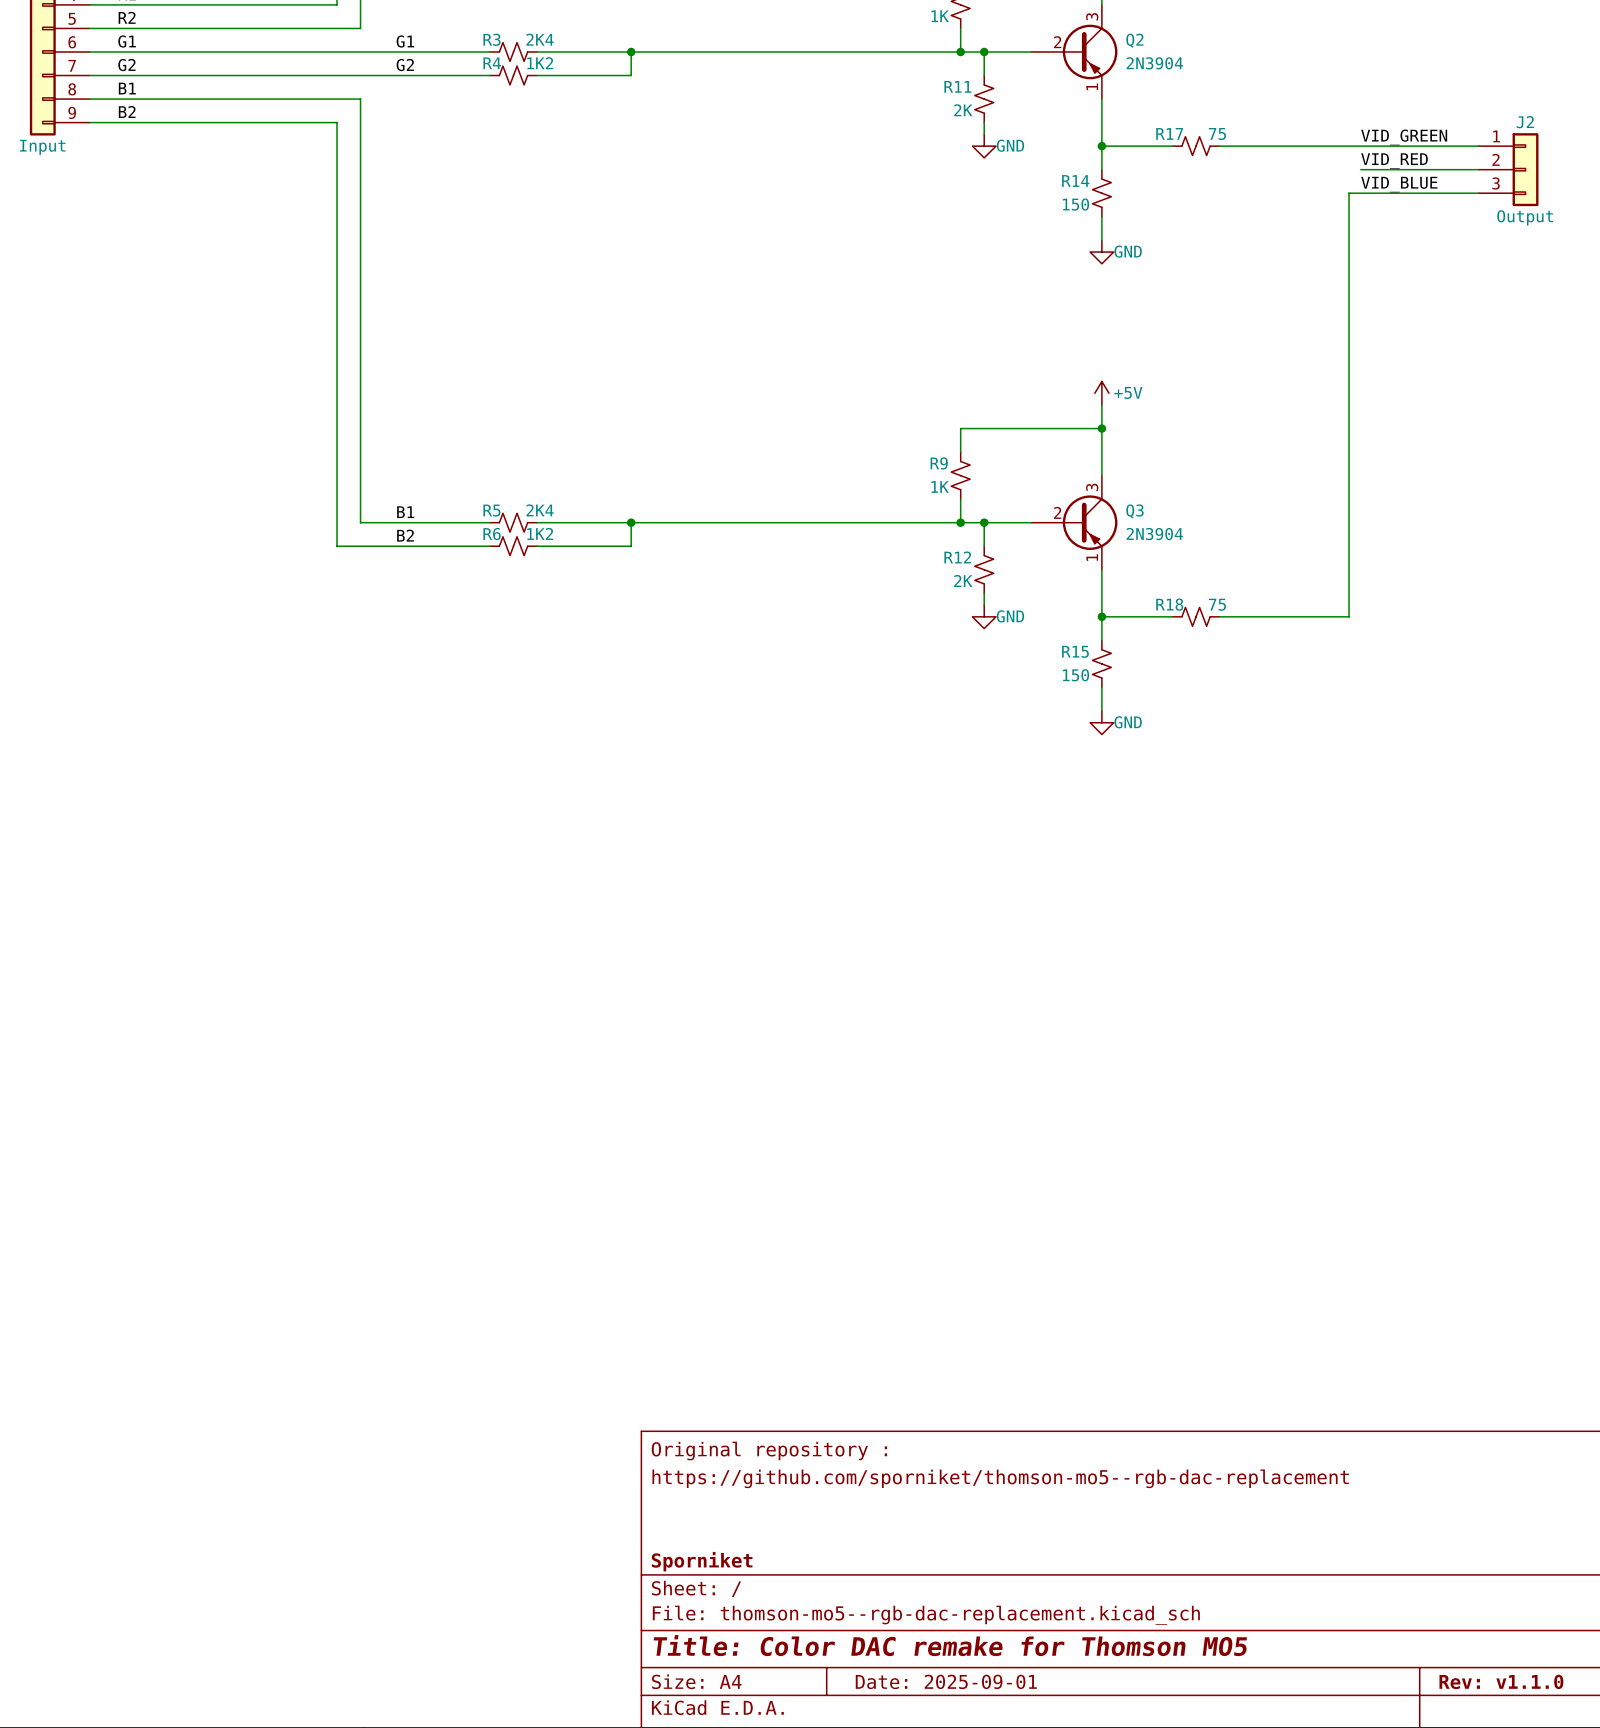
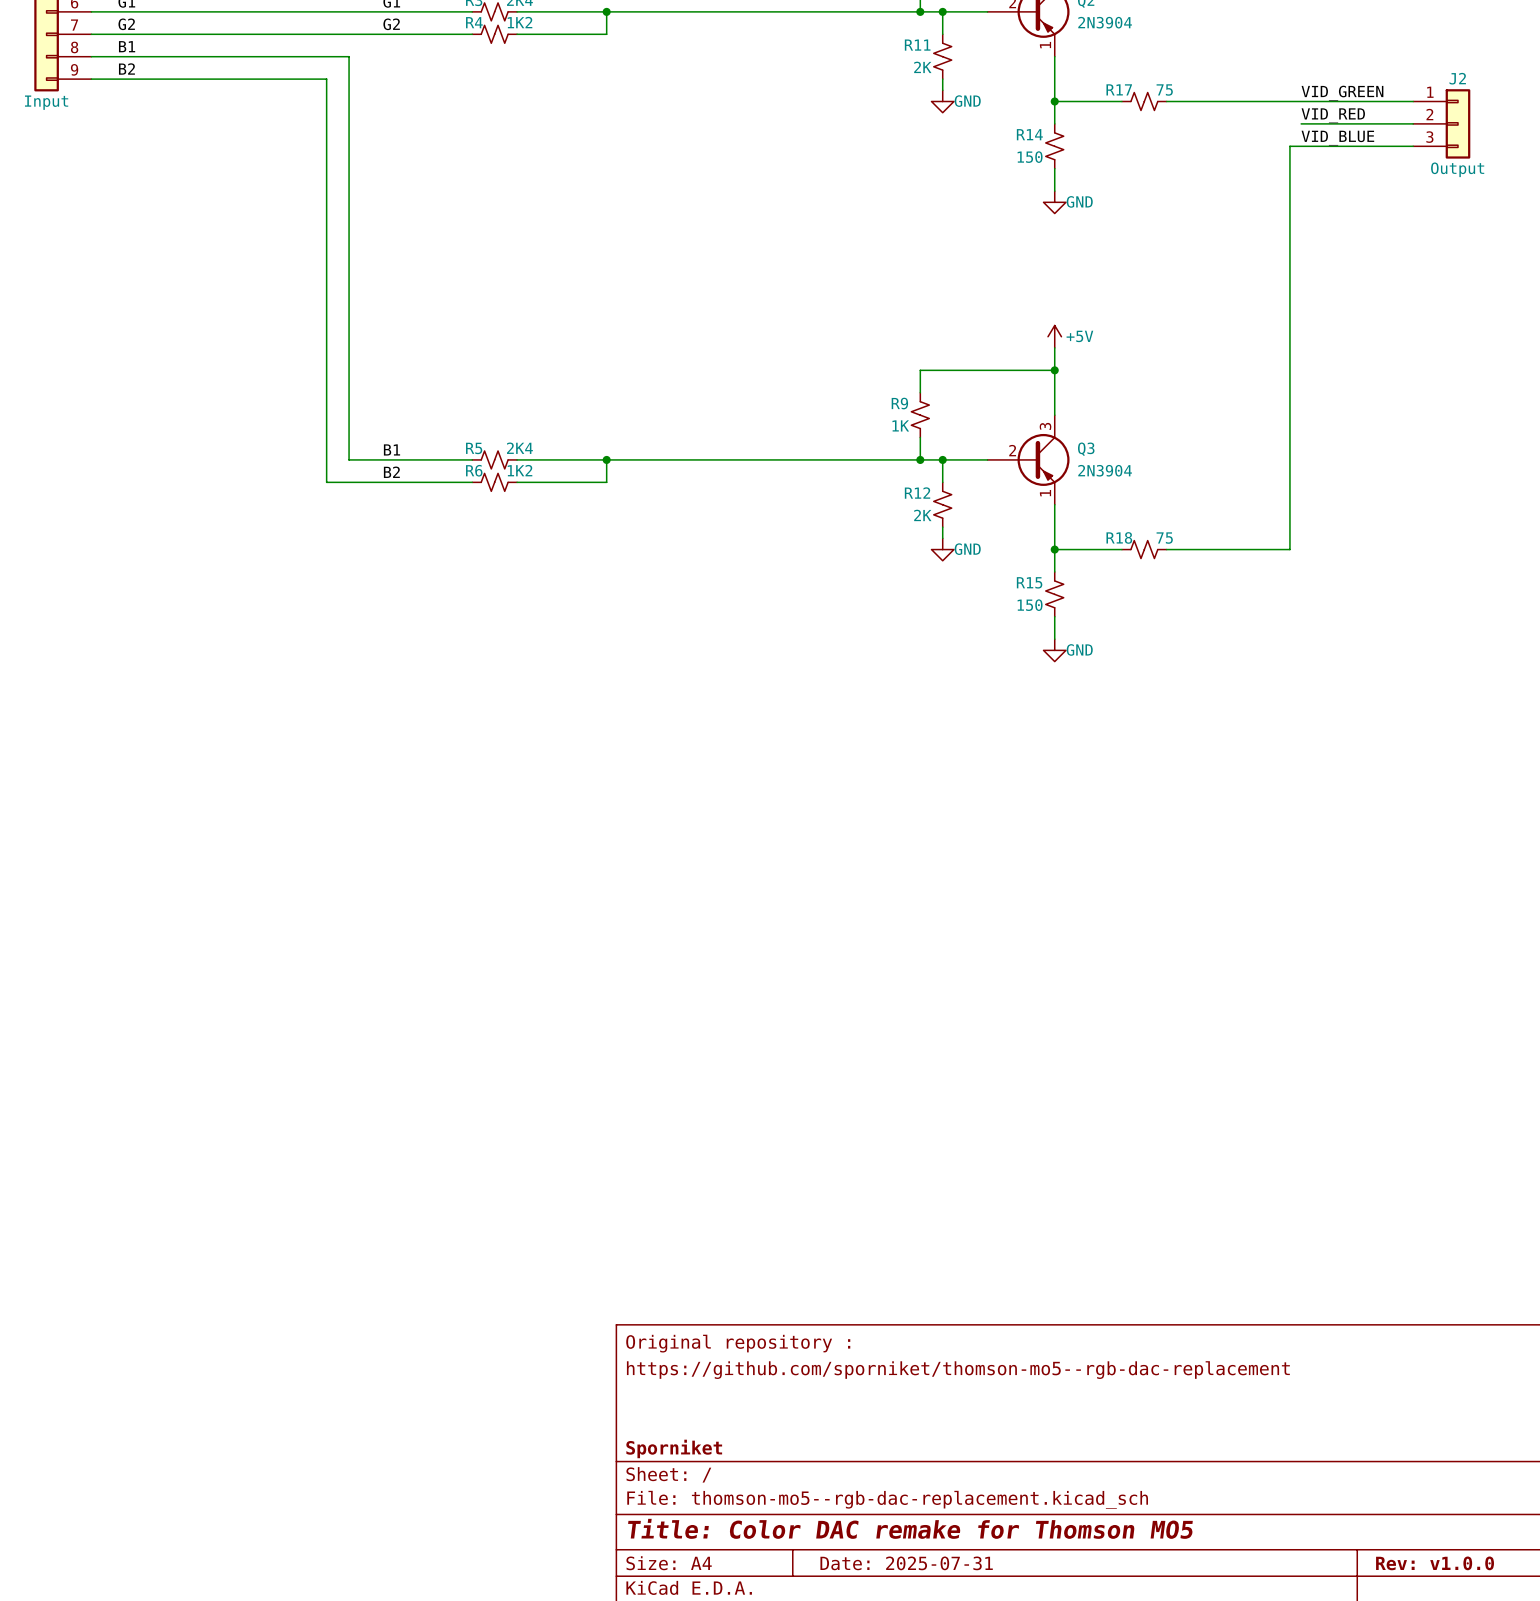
title block: Date: 2025-09-01 (946, 1681) -> Date: 2025-07-31 (906, 1563)
title block: Rev: v1.1.0 (1501, 1681) -> Rev: v1.0.0 (1435, 1563)

